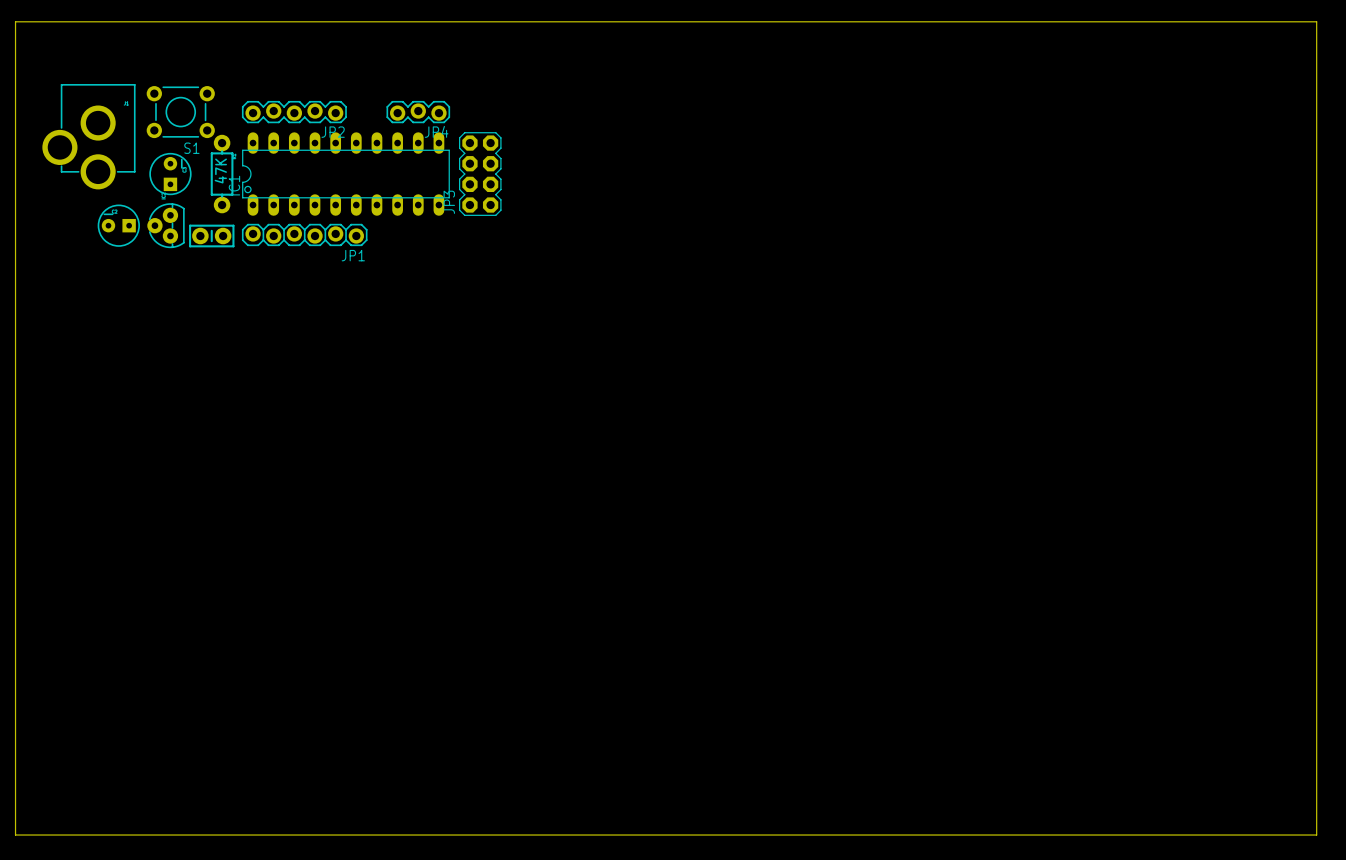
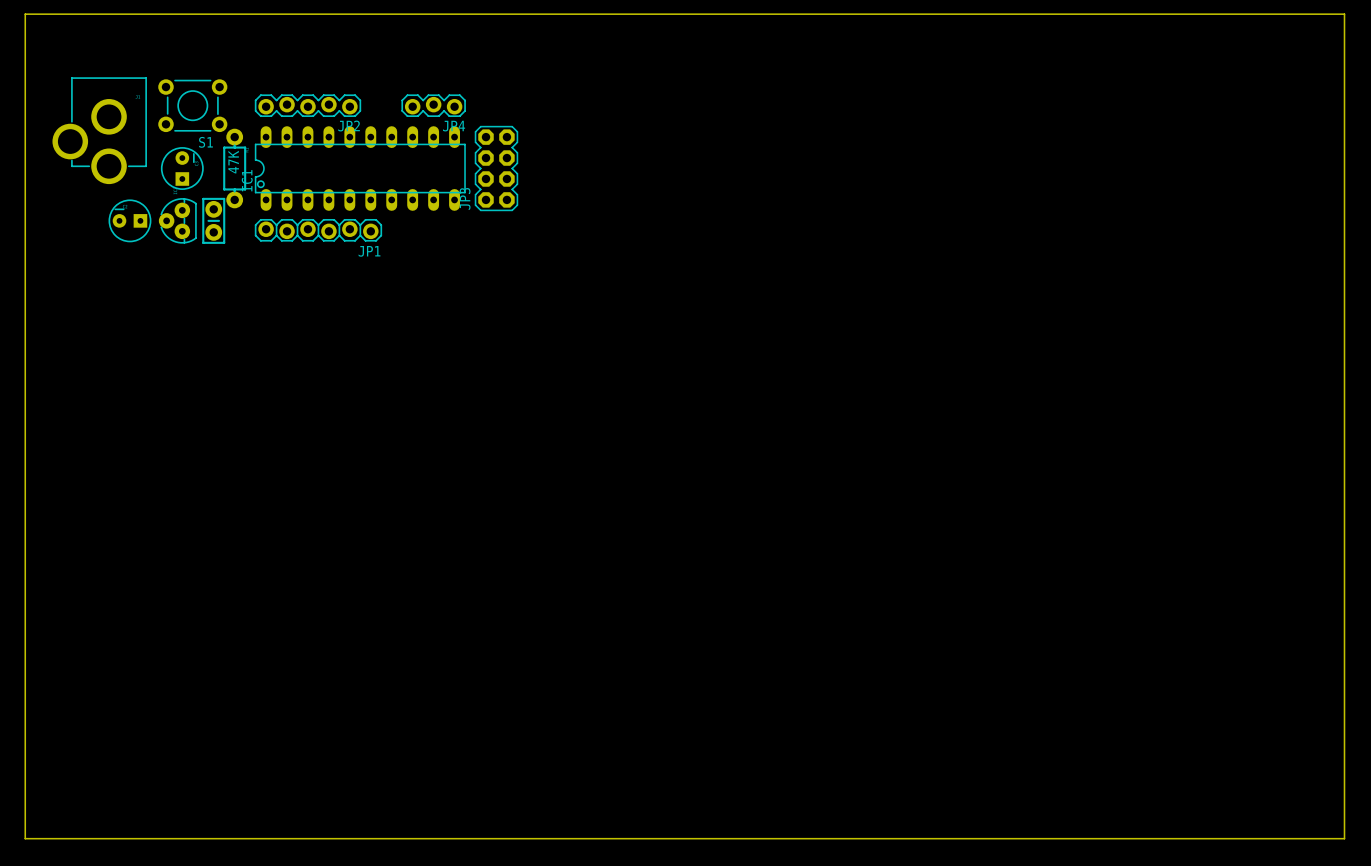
part rotation: 0° (211, 236) -> 90° clockwise (213, 220)

